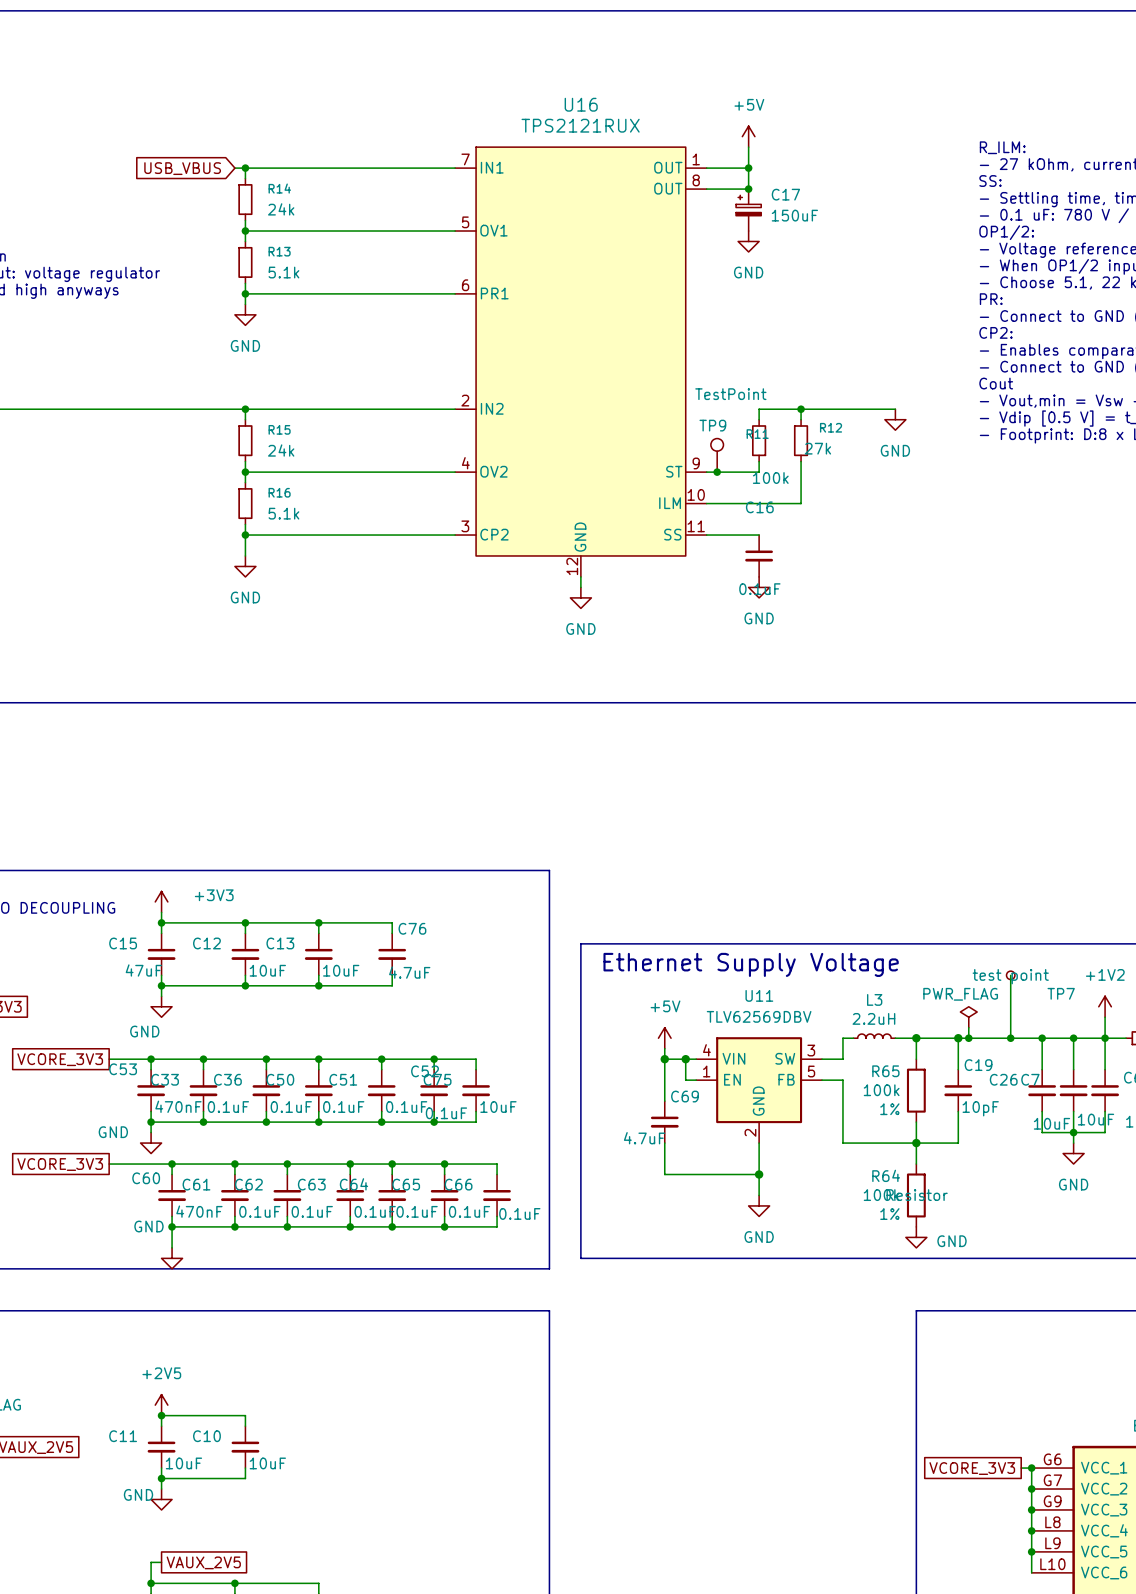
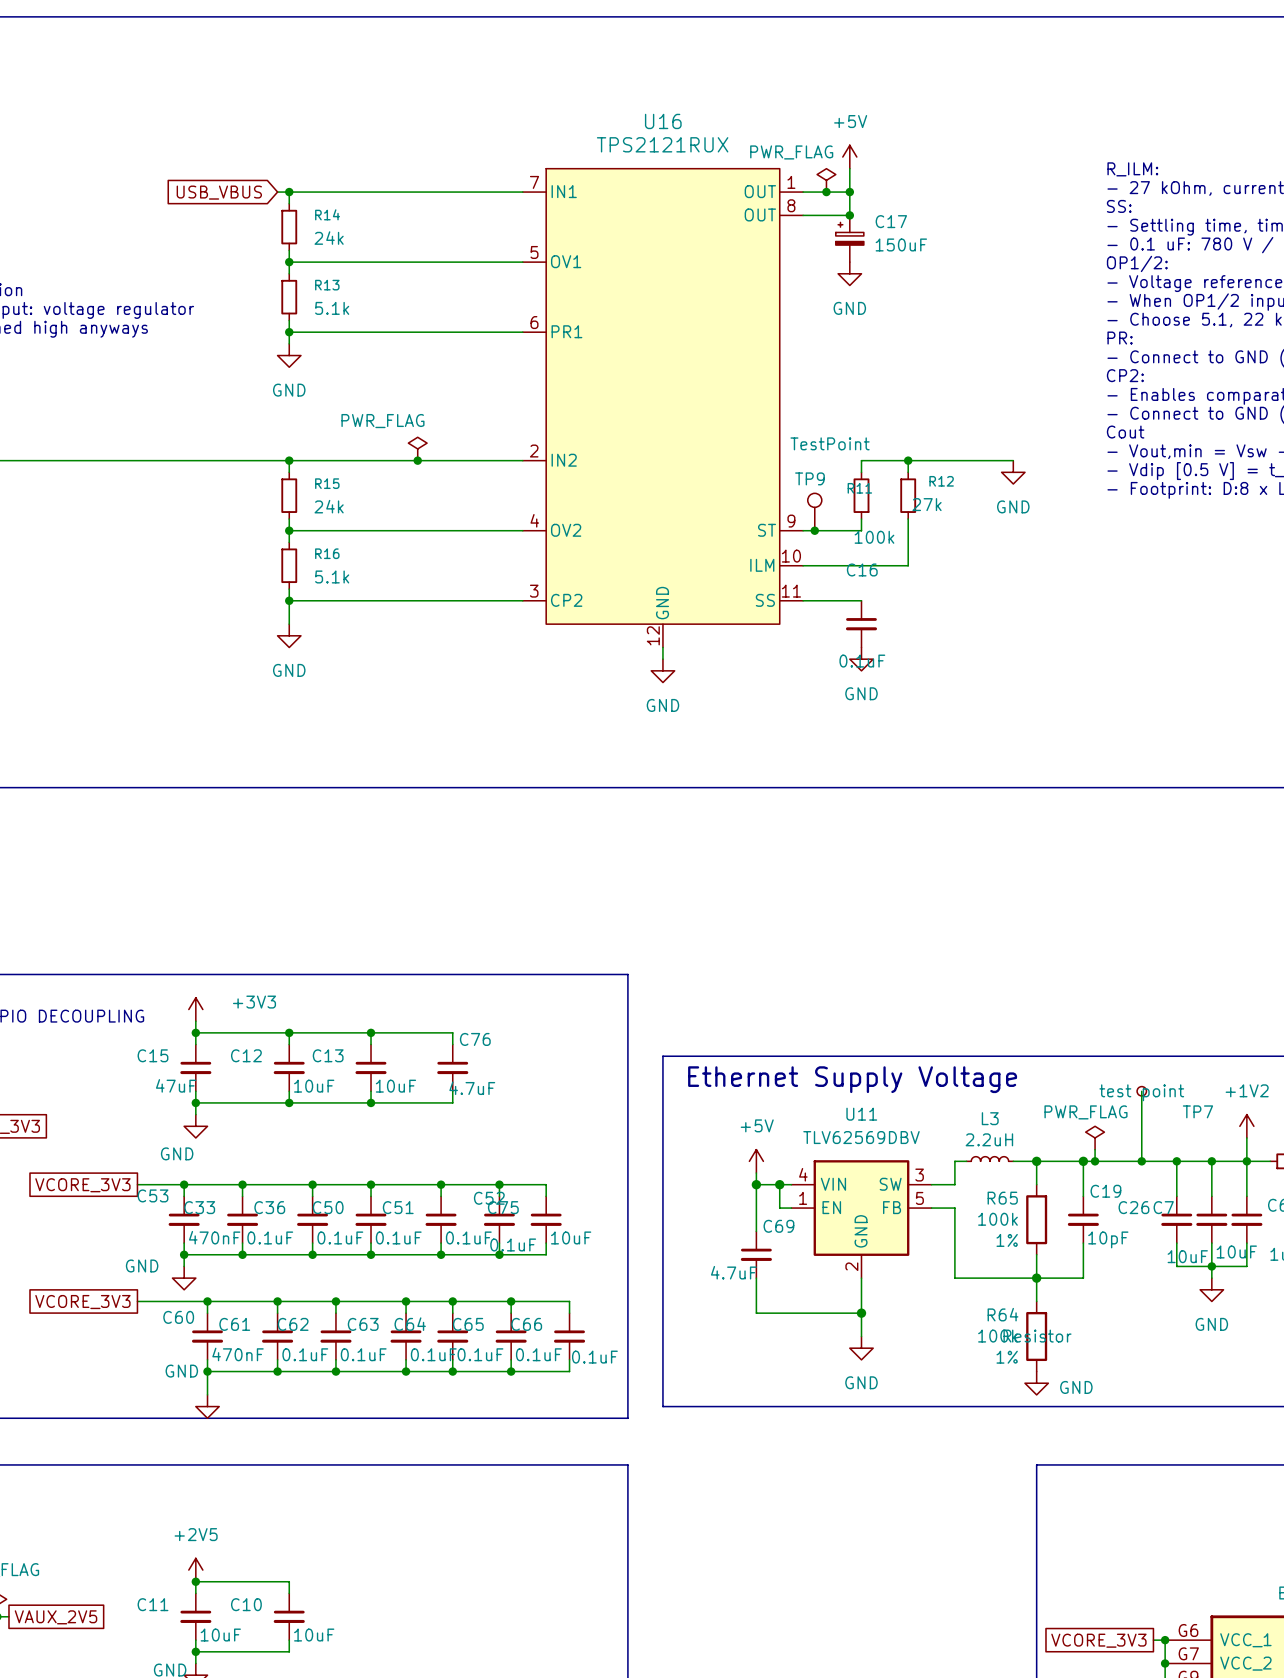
power symbol: none -> PWR_FLAG (826, 180)
junction: none -> (826, 192)
power symbol: none -> PWR_FLAG (417, 448)
junction: none -> (417, 460)

